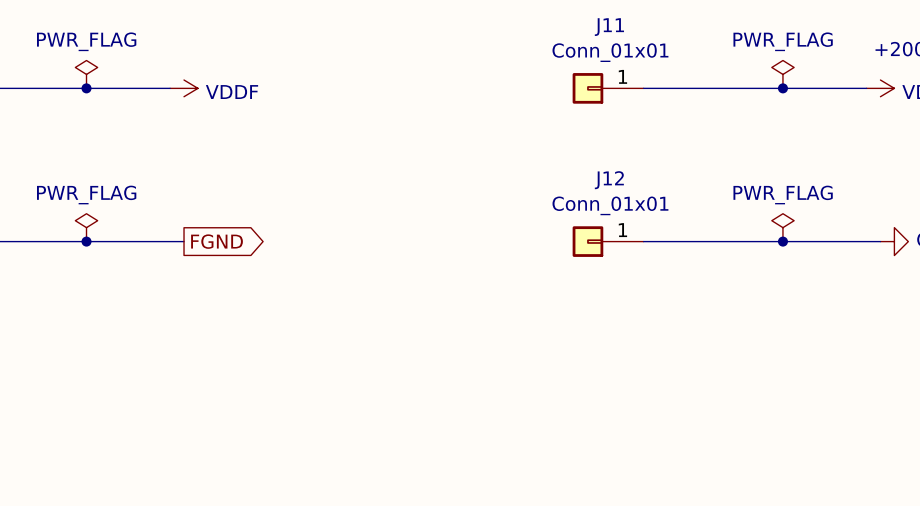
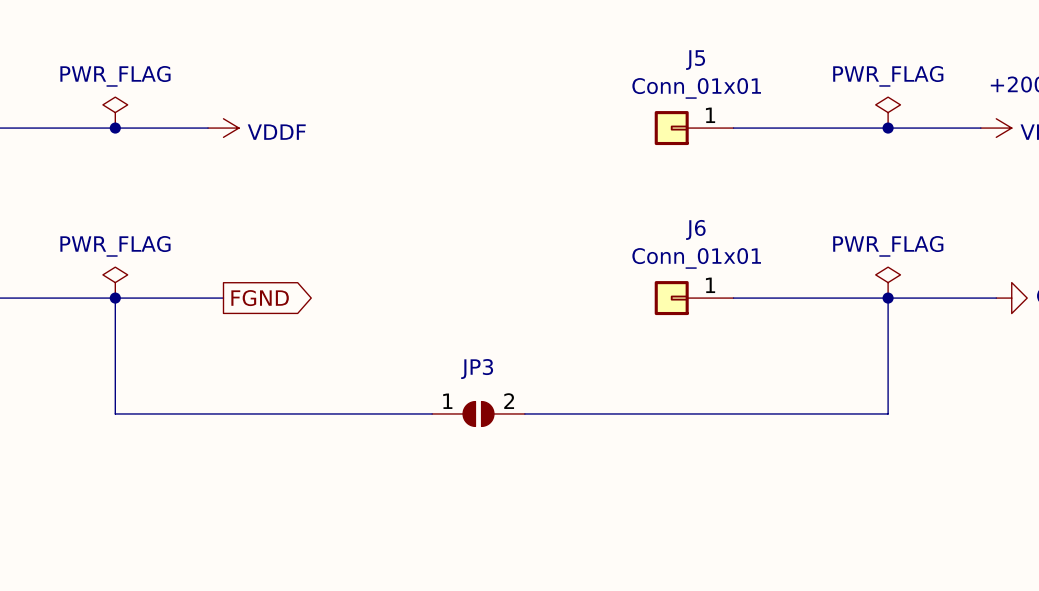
J11 name: J11 (609, 27) -> J5 (695, 60)
J12 name: J12 (609, 180) -> J6 (695, 229)
wire: none -> (115, 298) (115, 413) (432, 413)
wire: none -> (888, 298) (888, 413) (524, 413)
JP3: none -> (478, 413)

